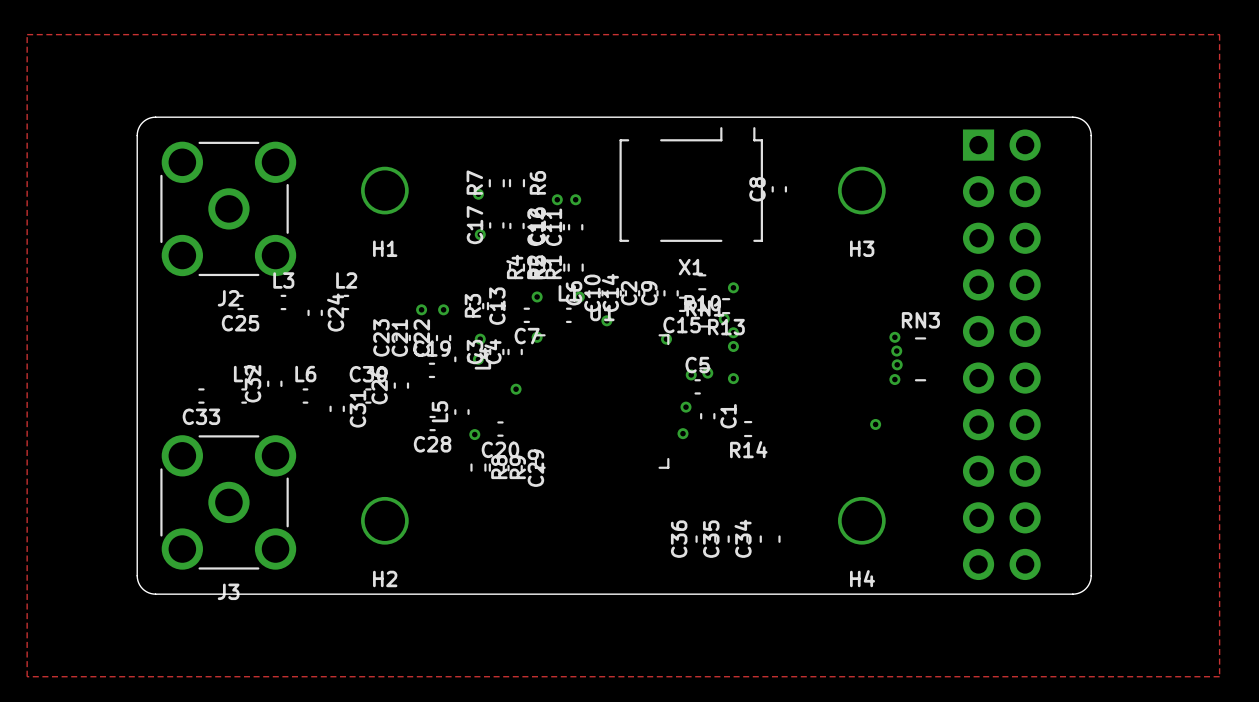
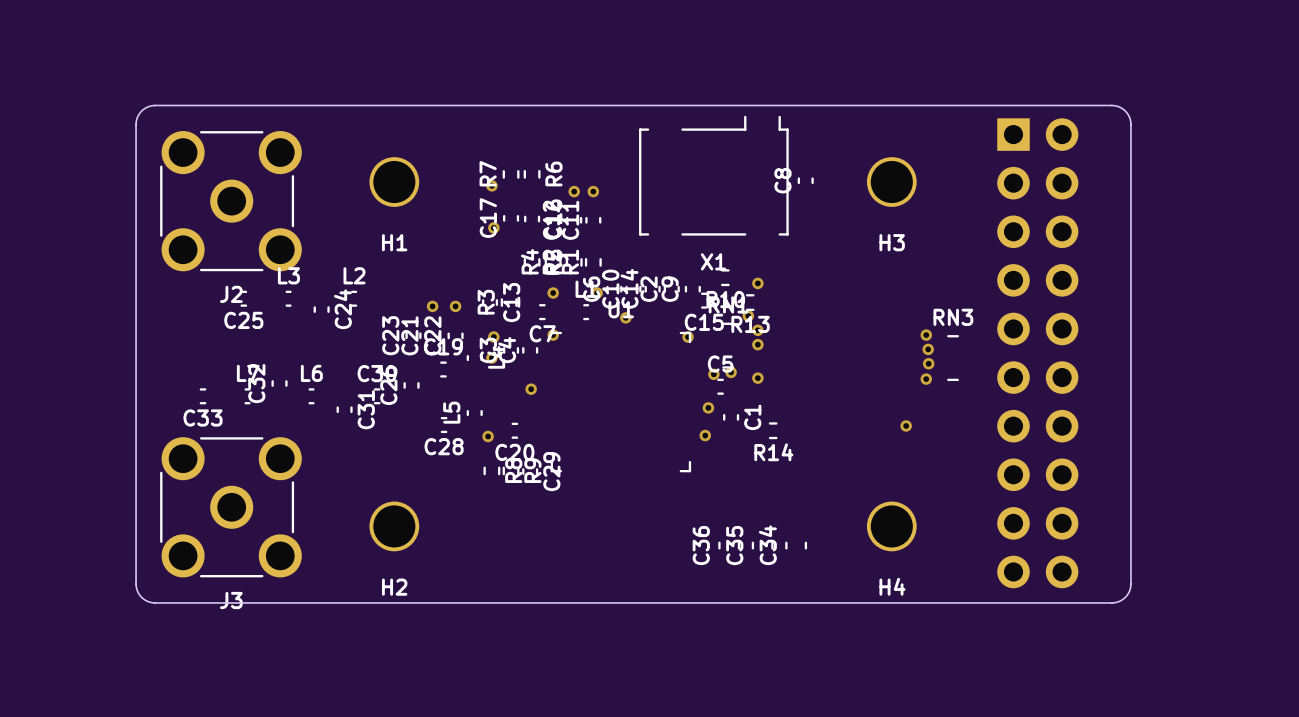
zone outline: (27, 34) (27, 676) (1219, 676) (1219, 34) (27, 34) -> none

